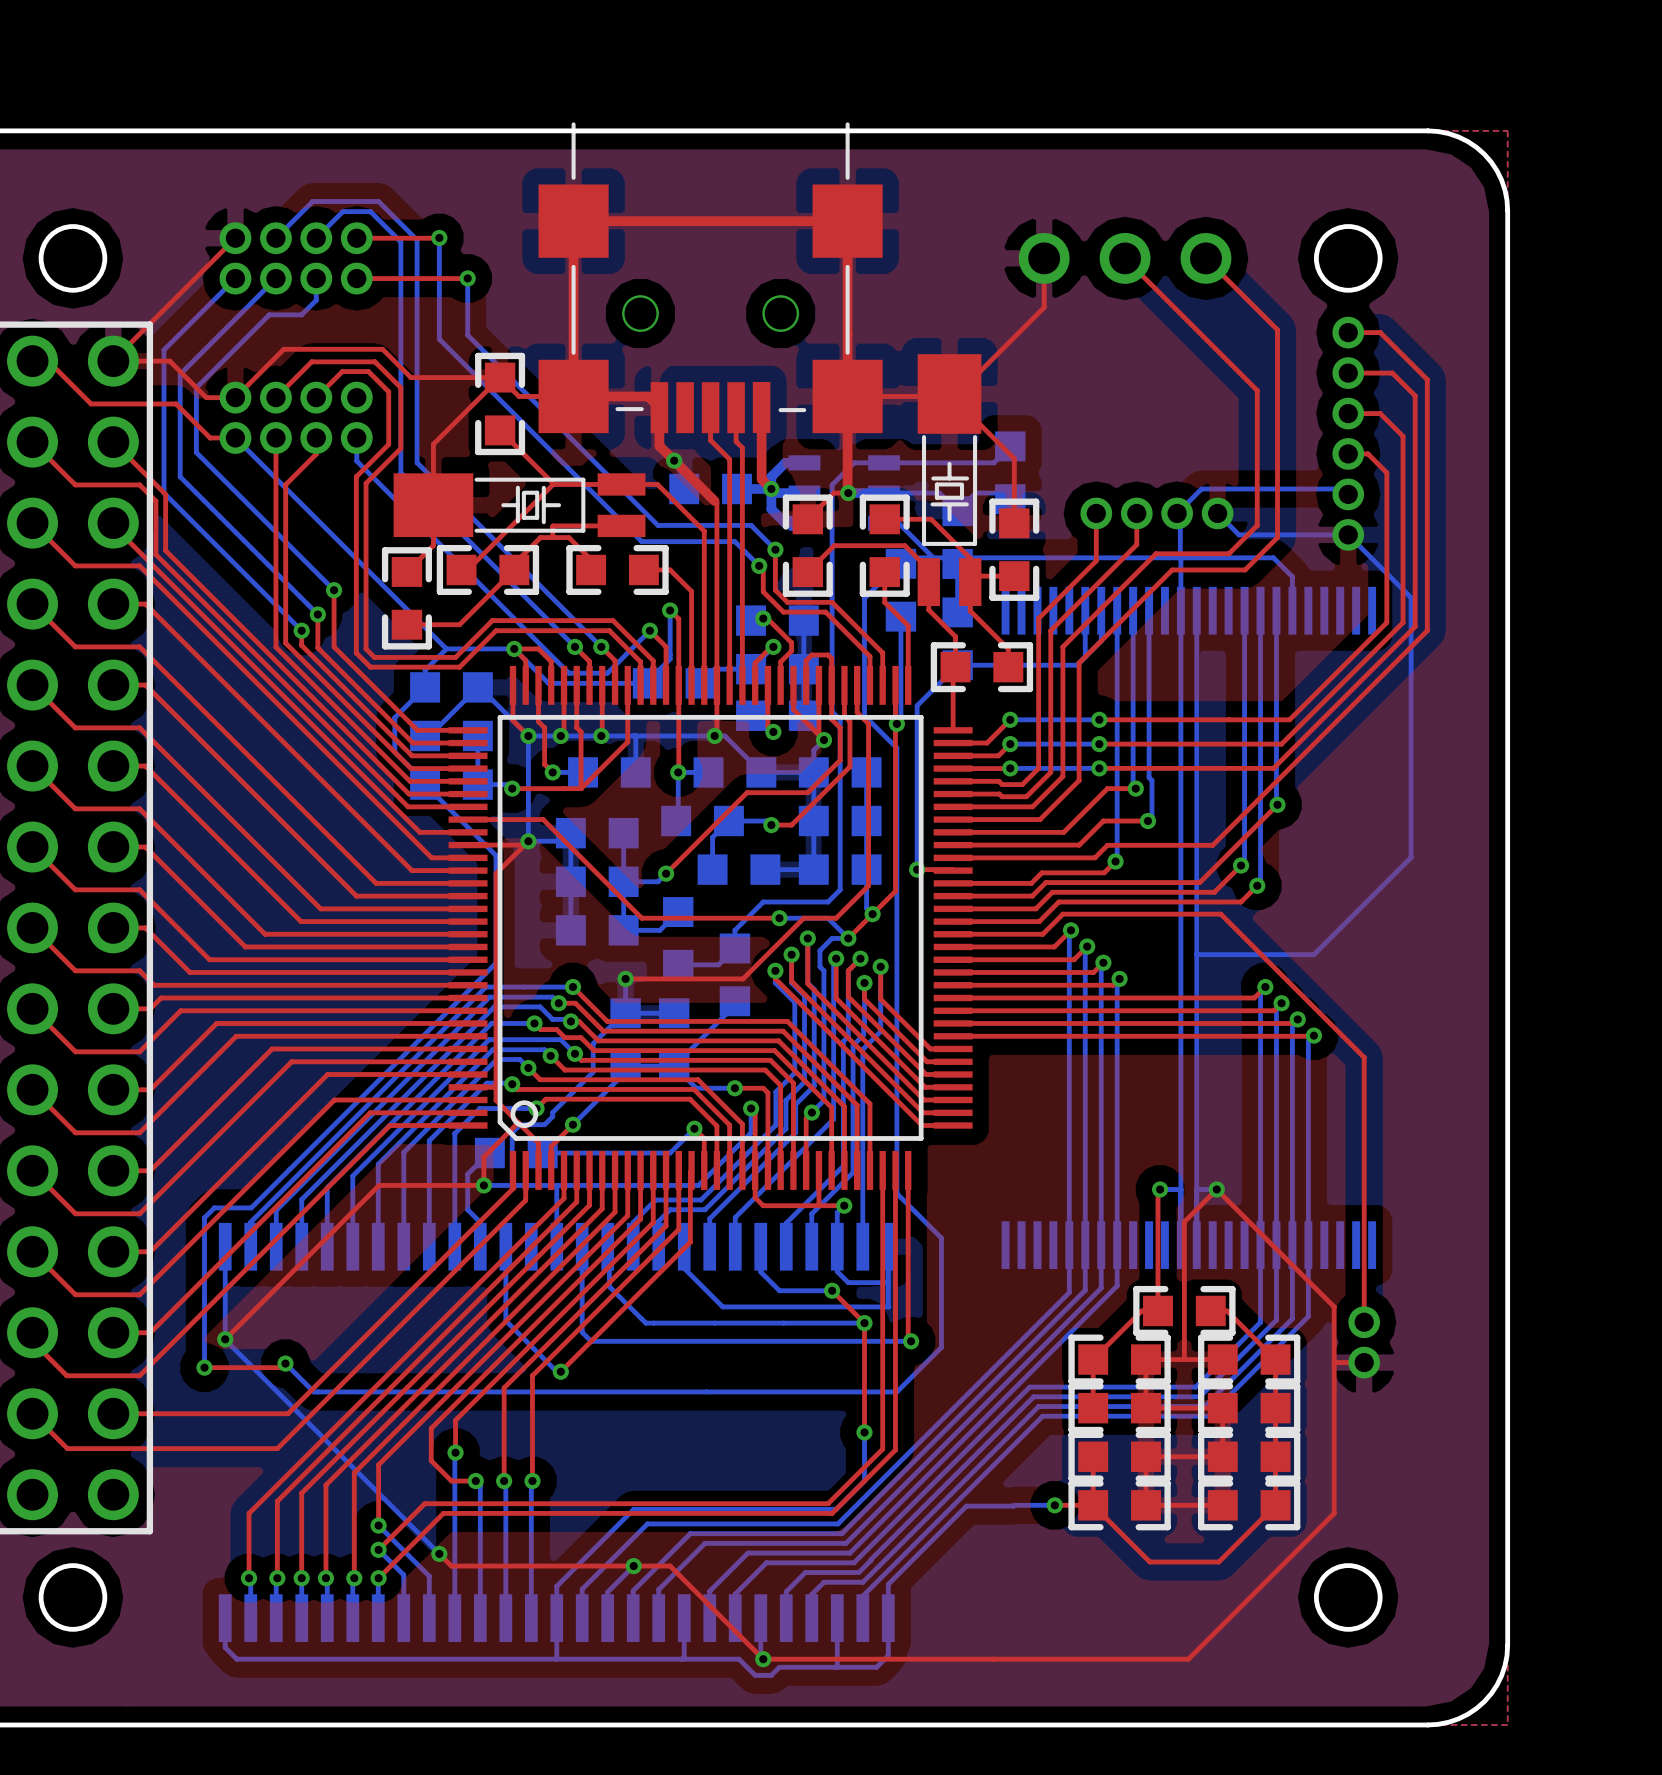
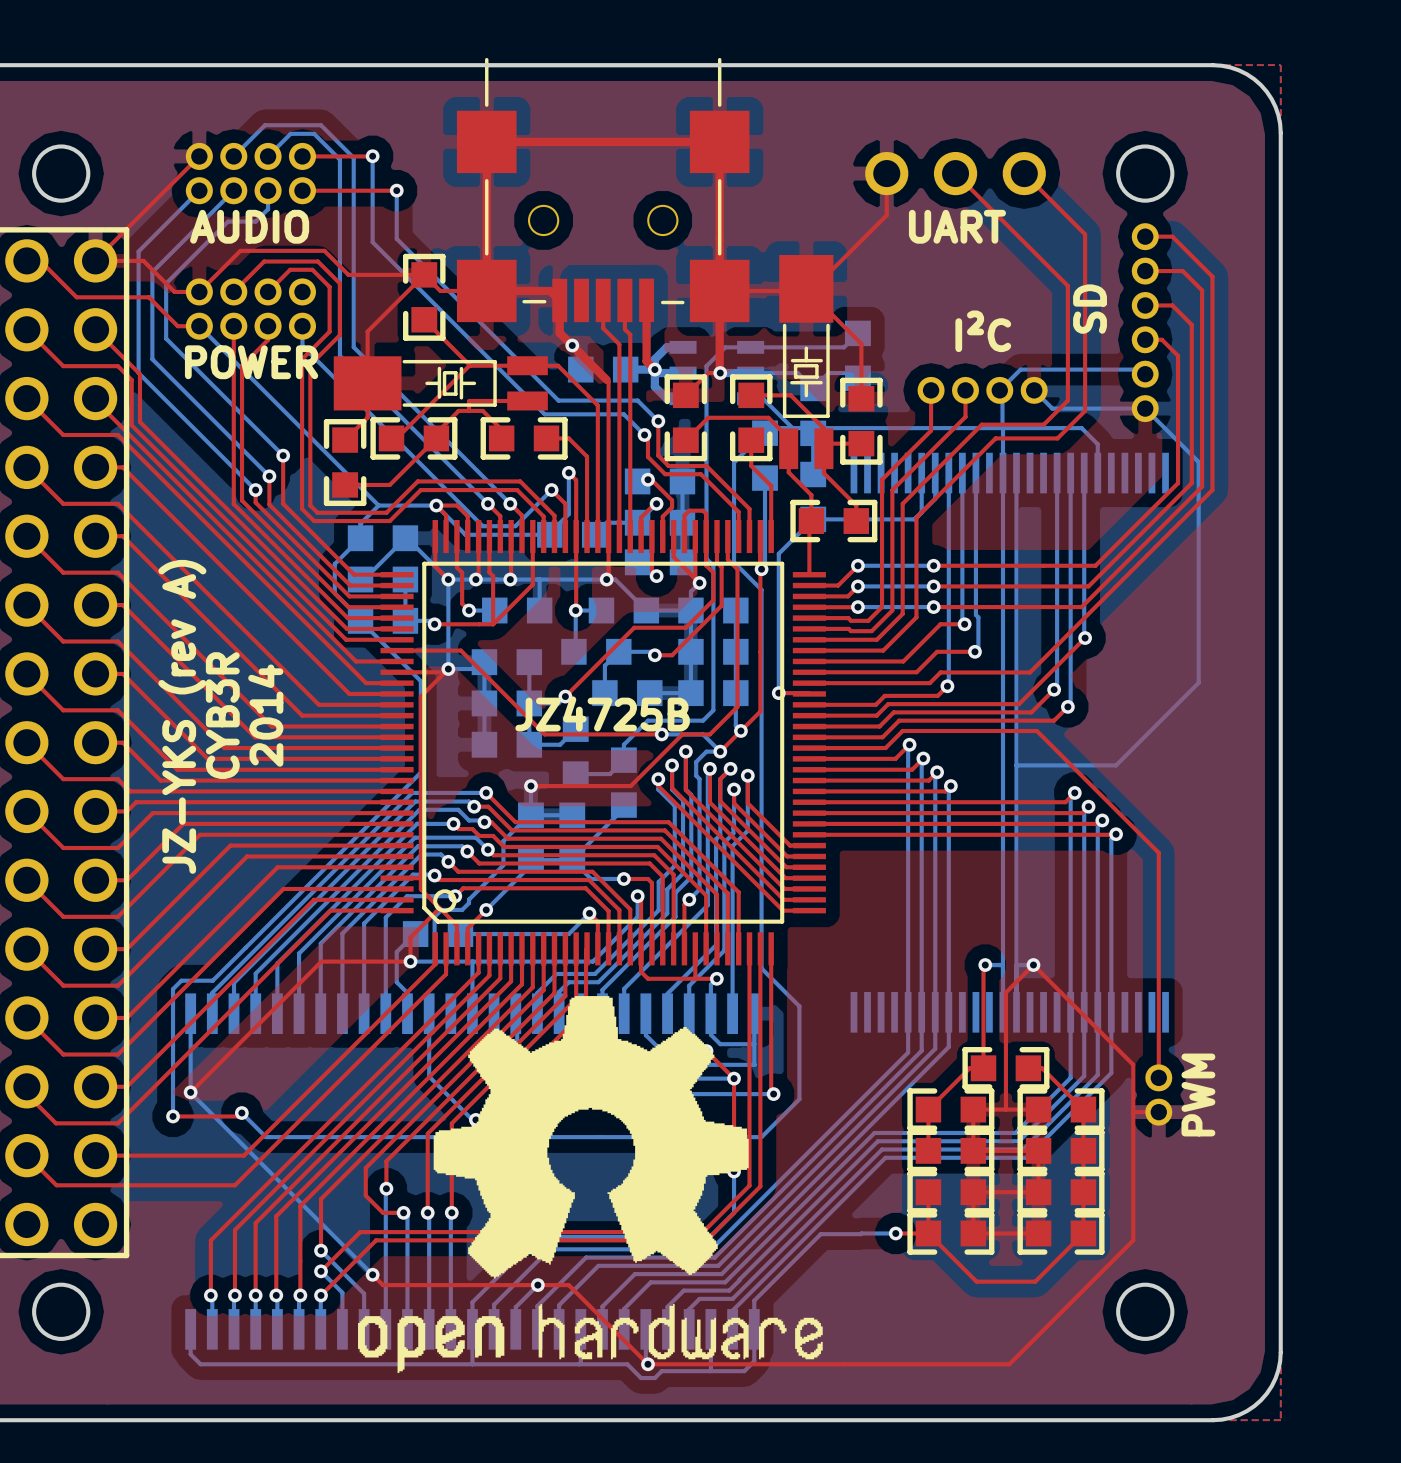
text: none -> AUDIO (249, 226)
text: none -> UART (957, 226)
text: none -> SD (1090, 309)
text: none -> I²C (983, 331)
text: none -> POWER (251, 362)
text: none -> JZ4725B (602, 713)
text: none -> CYB3R (222, 715)
text: none -> 2014 (265, 715)
text: none -> JZ-YKS (rev A) (182, 716)
drawing: none -> [357, 996, 823, 1373]
text: none -> PWM (1198, 1095)

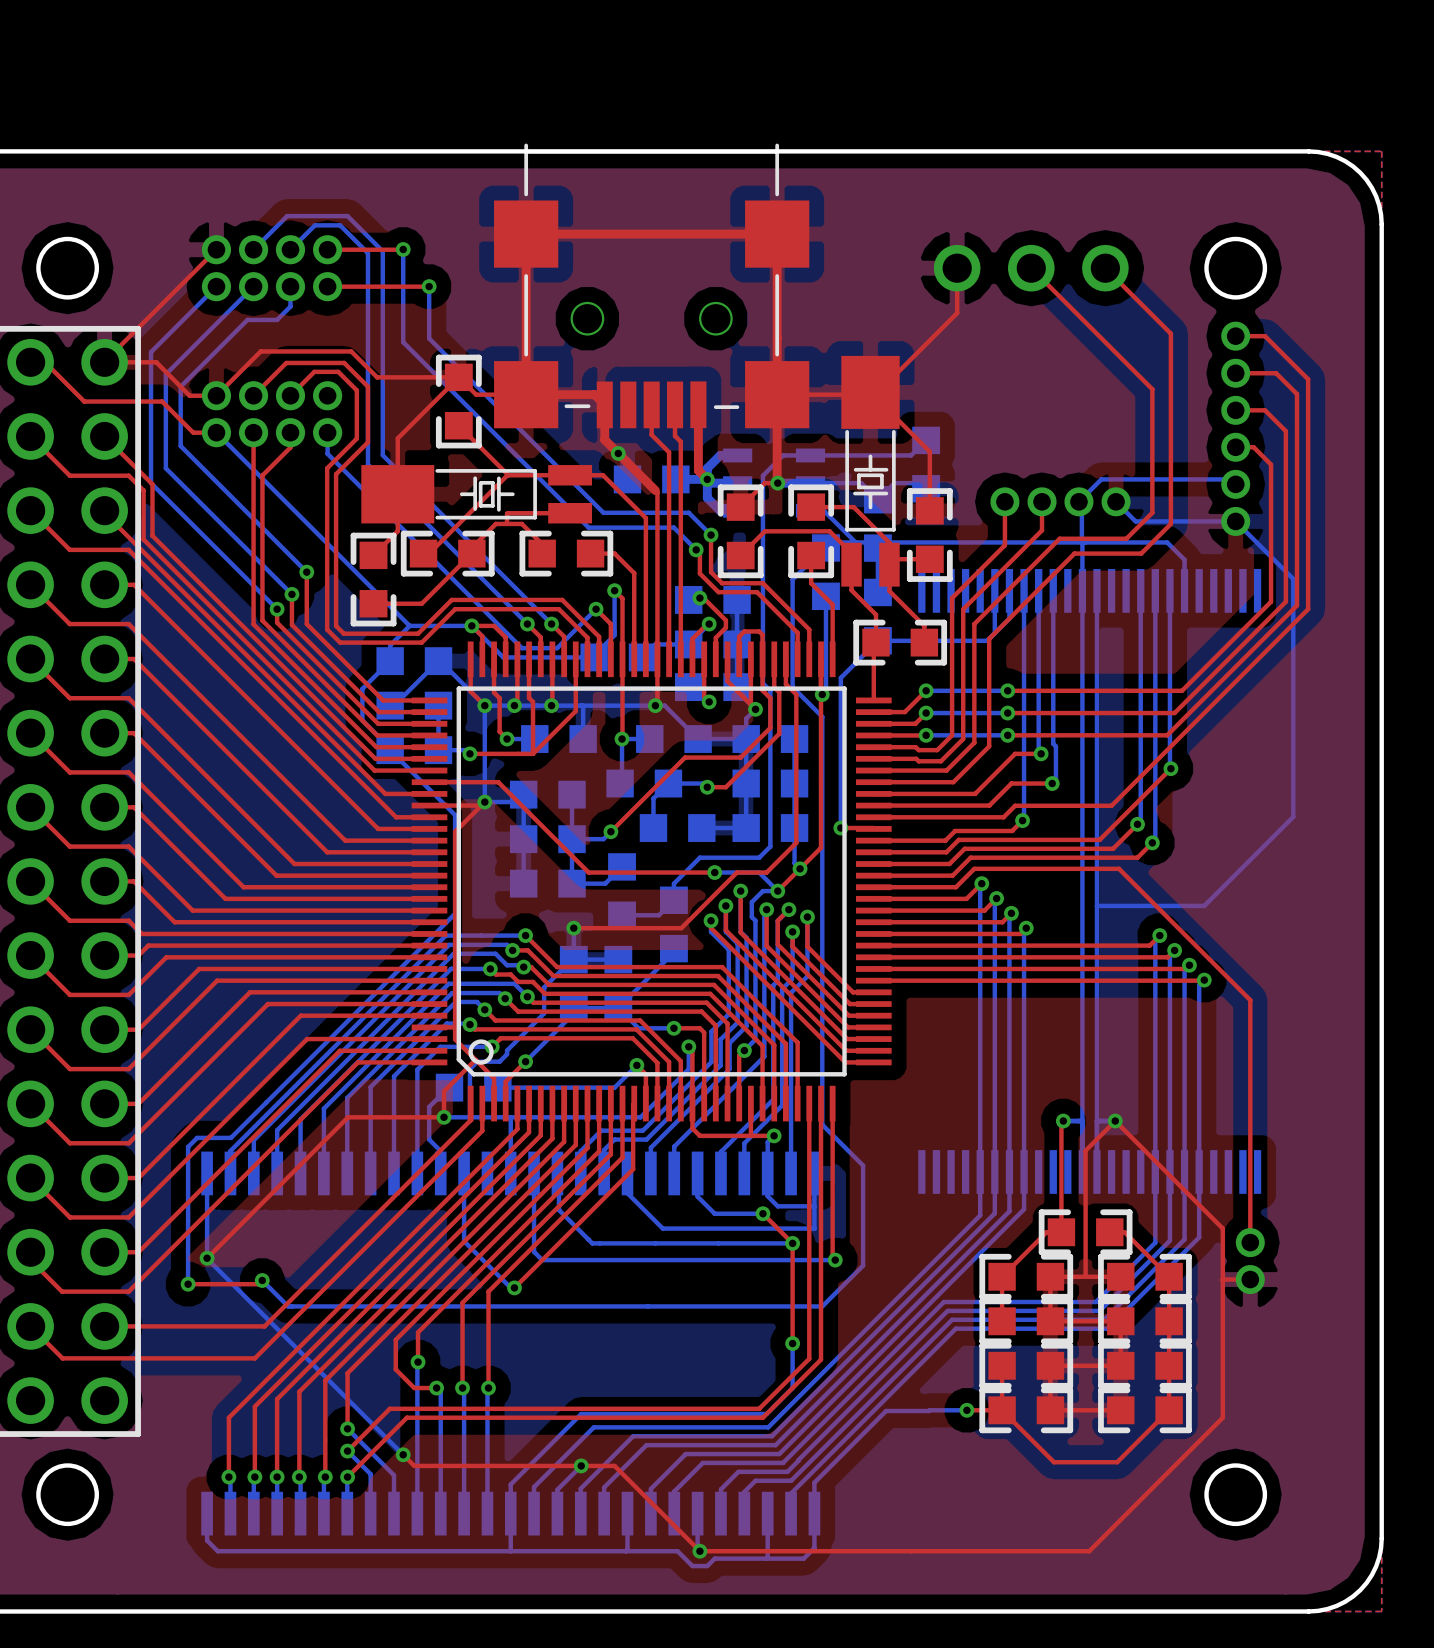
text: AUDIO (249, 226) -> none
text: UART (957, 226) -> none
text: SD (1090, 309) -> none
text: I²C (983, 331) -> none
text: POWER (251, 362) -> none
text: JZ4725B (602, 713) -> none
text: CYB3R (222, 715) -> none
text: 2014 (265, 715) -> none
text: JZ-YKS (rev A) (182, 716) -> none
drawing: [357, 996, 823, 1373] -> none
text: PWM (1198, 1095) -> none

